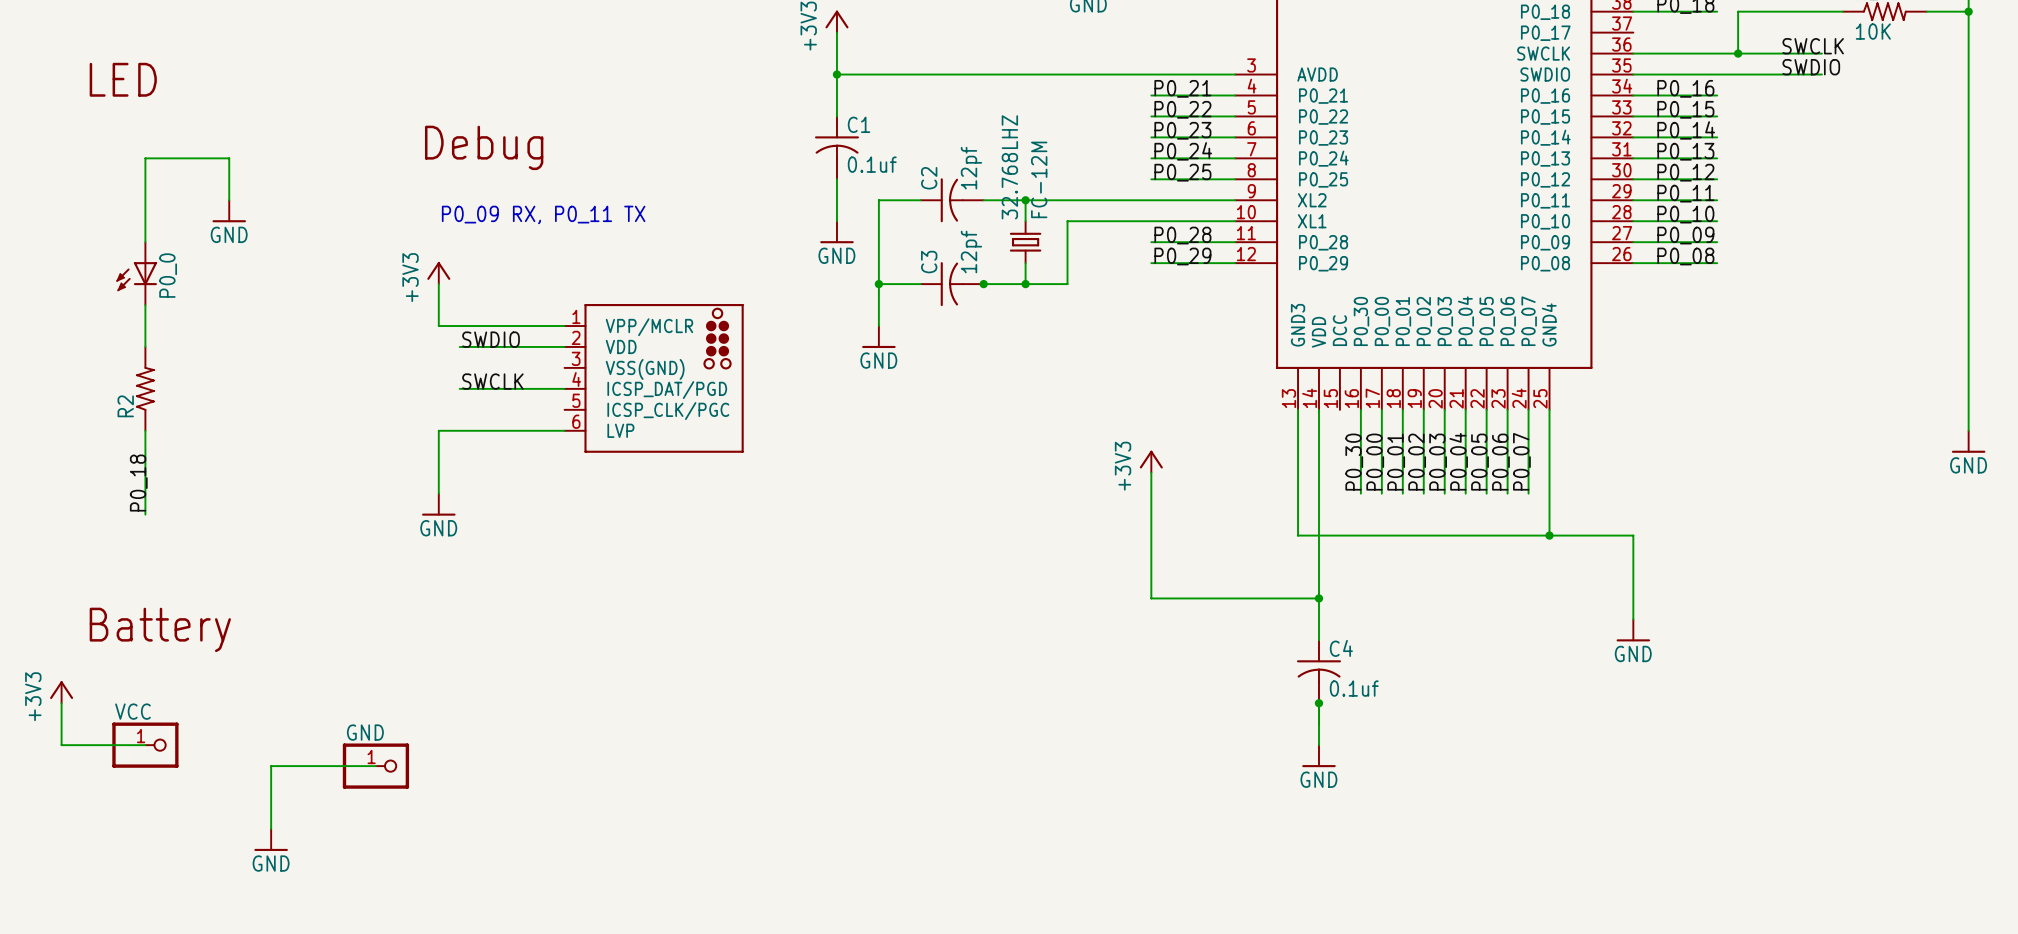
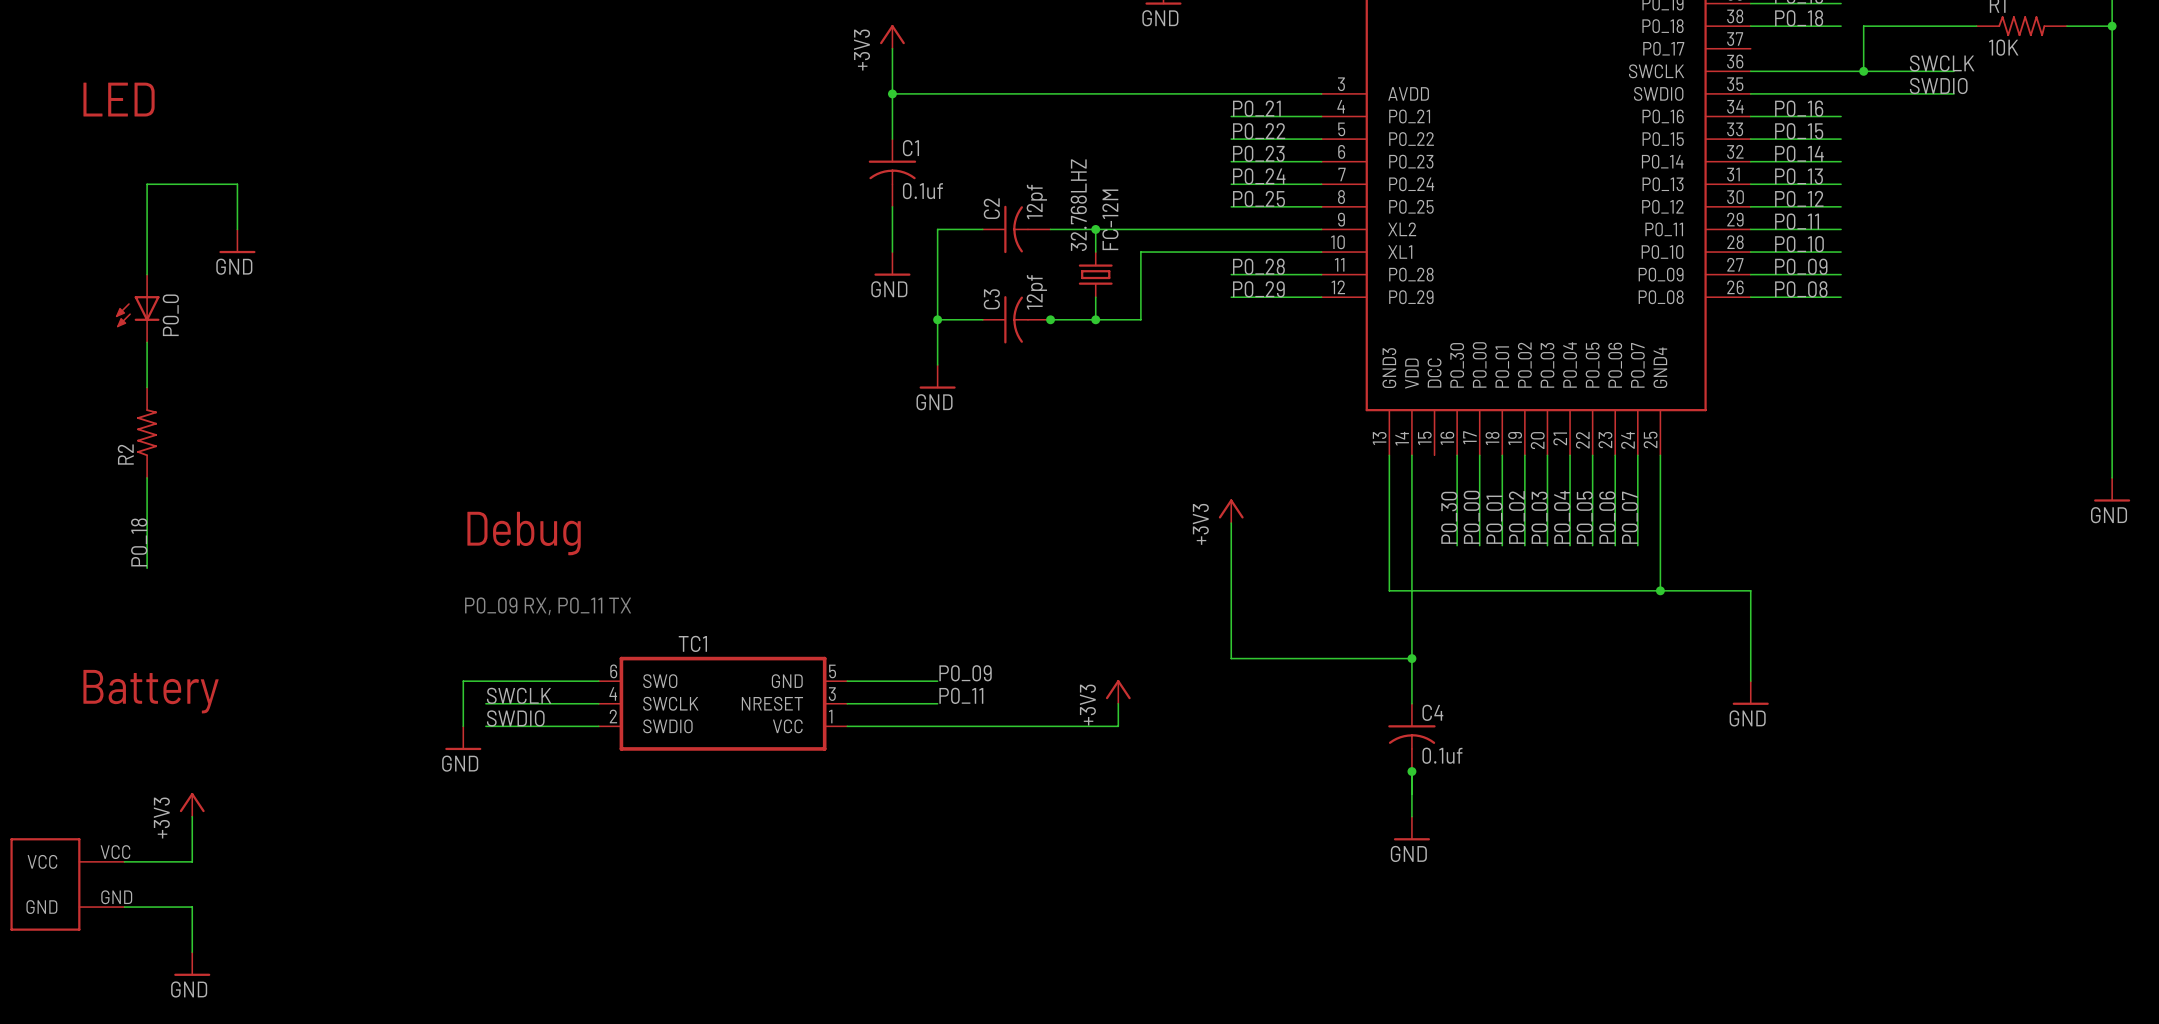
text: Debug (484, 147) -> none
text: P0_09 RX, P0_11 TX (543, 214) -> none
power symbol: +3V3 (438, 273) -> none
wire: (438, 284) (438, 326) (564, 326) -> none
label: SWDIO (491, 339) -> none
wire: (459, 346) (564, 346) -> none
part: (654, 378) -> none
label: SWCLK (492, 381) -> none
wire: (459, 388) (564, 388) -> none
wire: (564, 430) (438, 430) (438, 493) -> none
text: none -> Debug (524, 533)
power symbol: GND (438, 504) -> none
text: none -> P0_09 RX, P0_11 TX (548, 606)
label: none -> P0_09 (965, 673)
wire: none -> (598, 681) (463, 681) (463, 726)
wire: none -> (847, 681) (937, 681)
power symbol: none -> +3V3 (1118, 691)
label: none -> SWCLK (519, 695)
label: none -> P0_11 (961, 695)
wire: none -> (485, 703) (598, 703)
TC1: none -> (723, 703)
wire: none -> (847, 703) (937, 703)
wire: none -> (1118, 703) (1118, 726) (847, 726)
label: none -> SWDIO (515, 718)
wire: none -> (485, 726) (598, 726)
power symbol: none -> GND (463, 738)
power symbol position: +3V3 (61, 692) -> +3V3 (192, 804)
wire: (61, 703) (61, 745) (145, 745) -> none
VCC: (145, 745) -> none
wire: none -> (192, 816) (192, 861) (124, 861)
wire: (375, 766) (271, 766) (271, 828) -> none
GND: (375, 766) -> none
part: none -> (67, 884)
wire: none -> (124, 907) (192, 907) (192, 952)
power symbol position: GND (271, 839) -> GND (192, 964)

